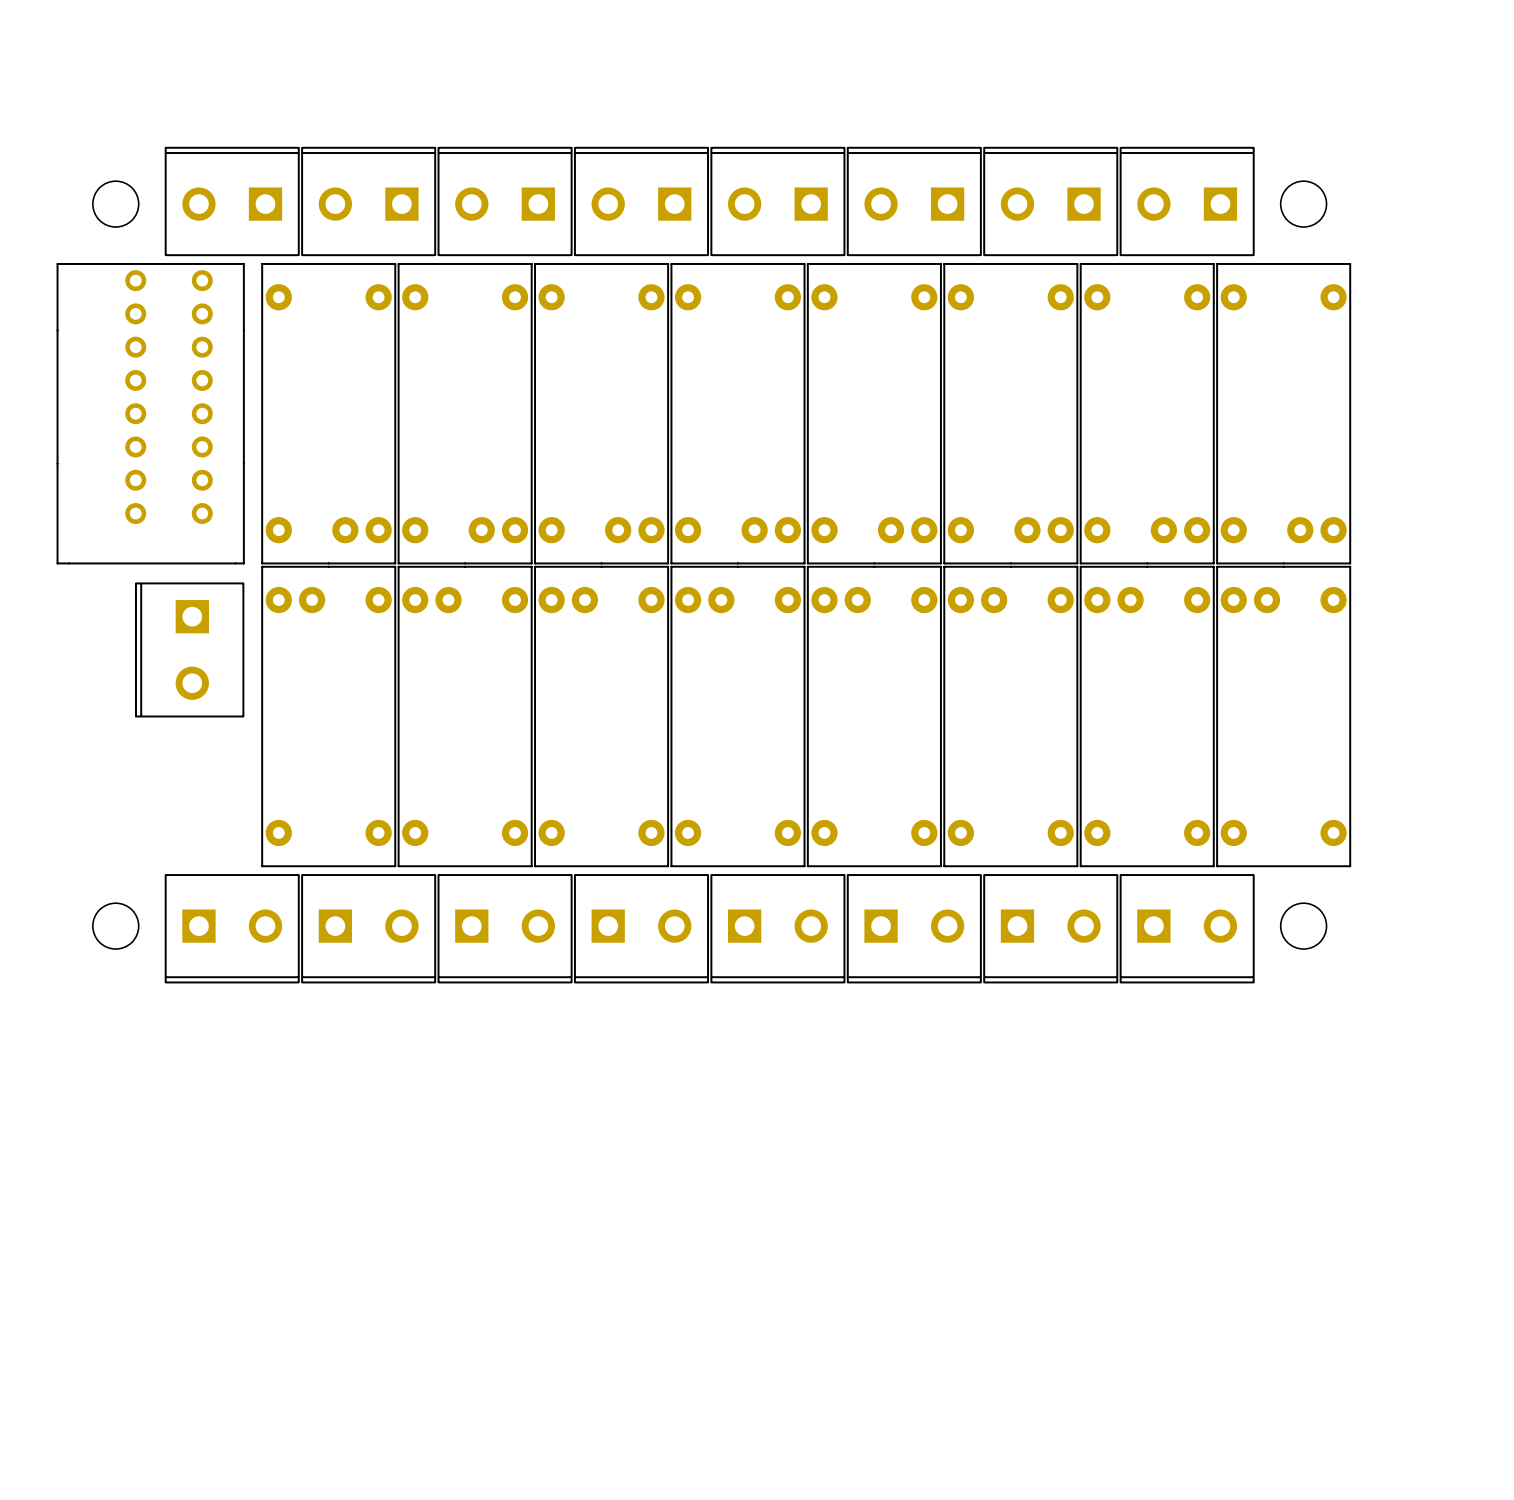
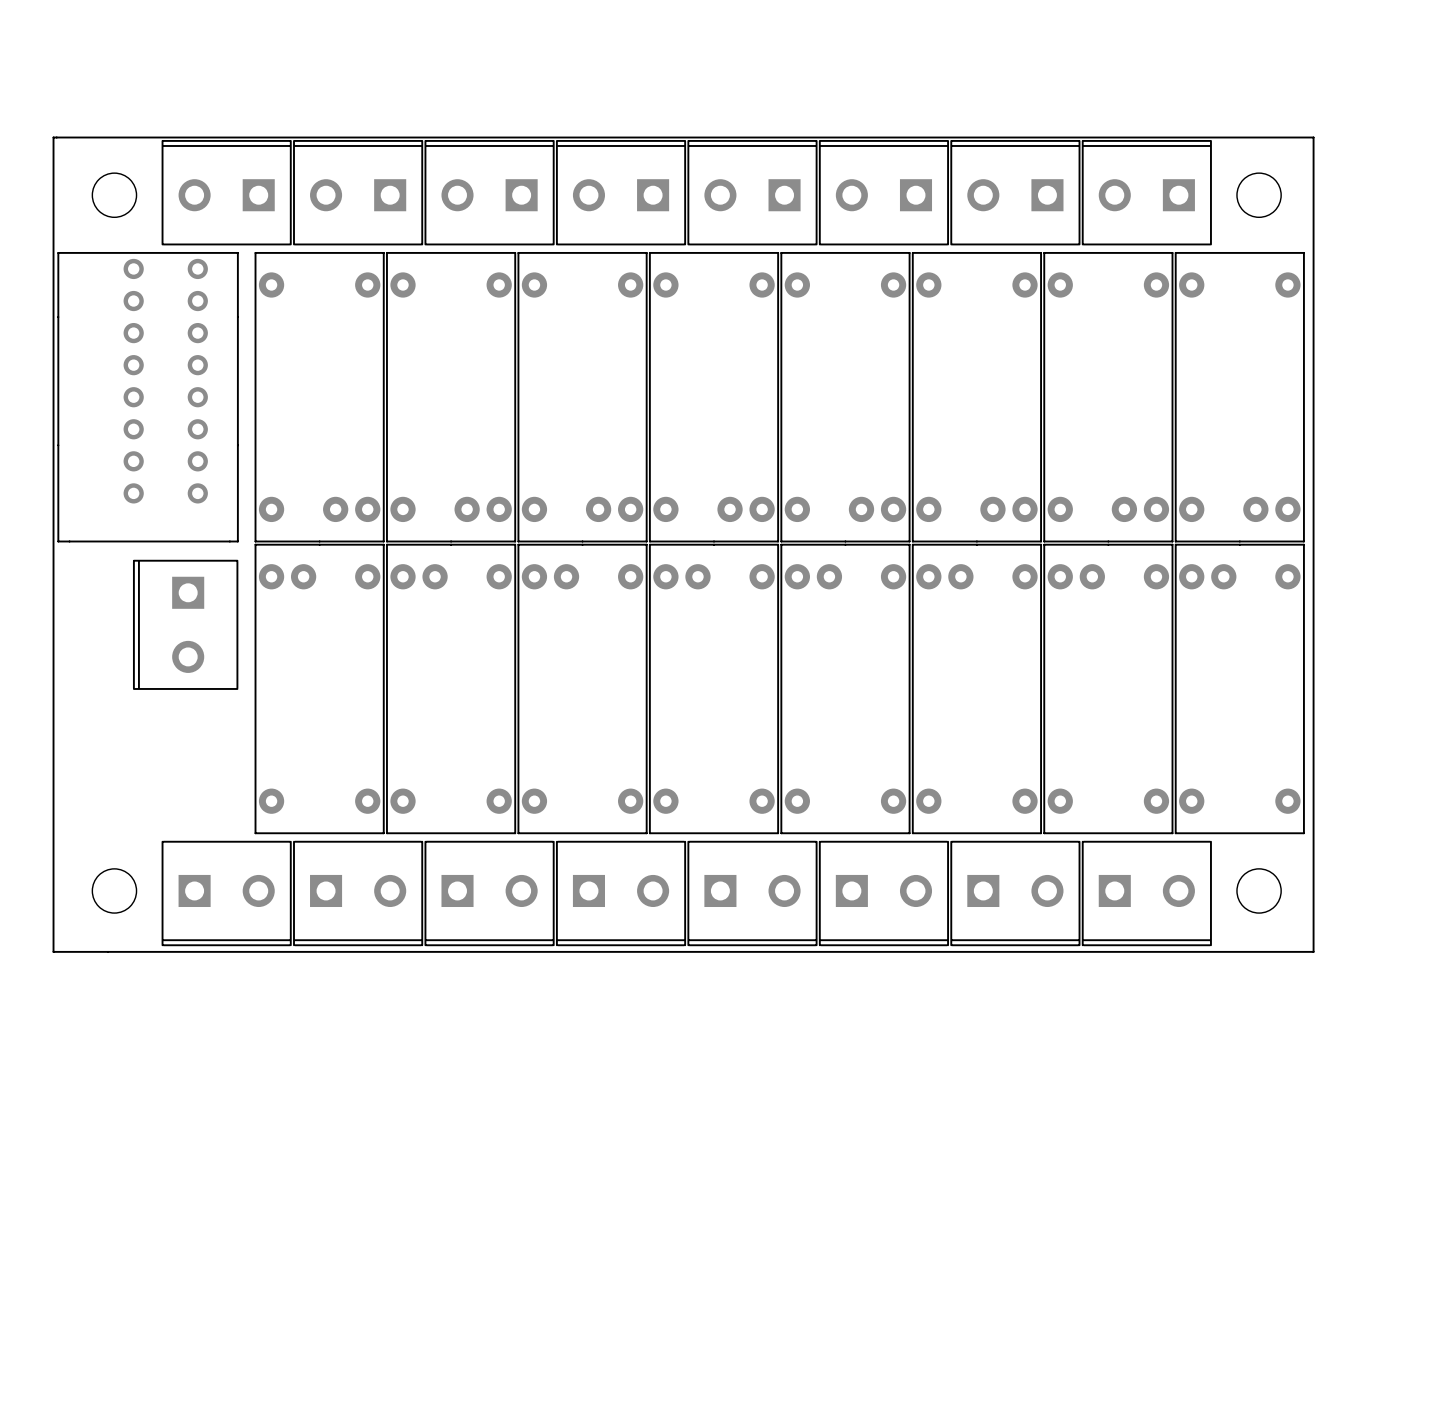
board edge: none -> (53, 137) (1313, 137) (1313, 951) (53, 951) (53, 137)

